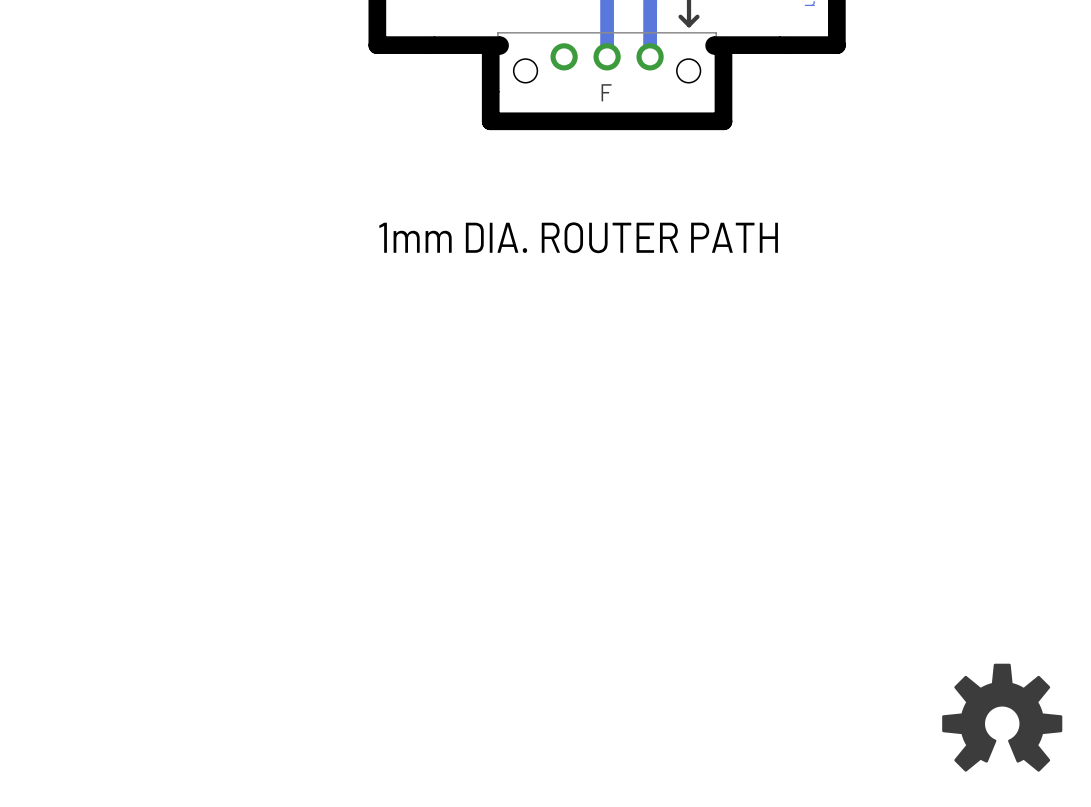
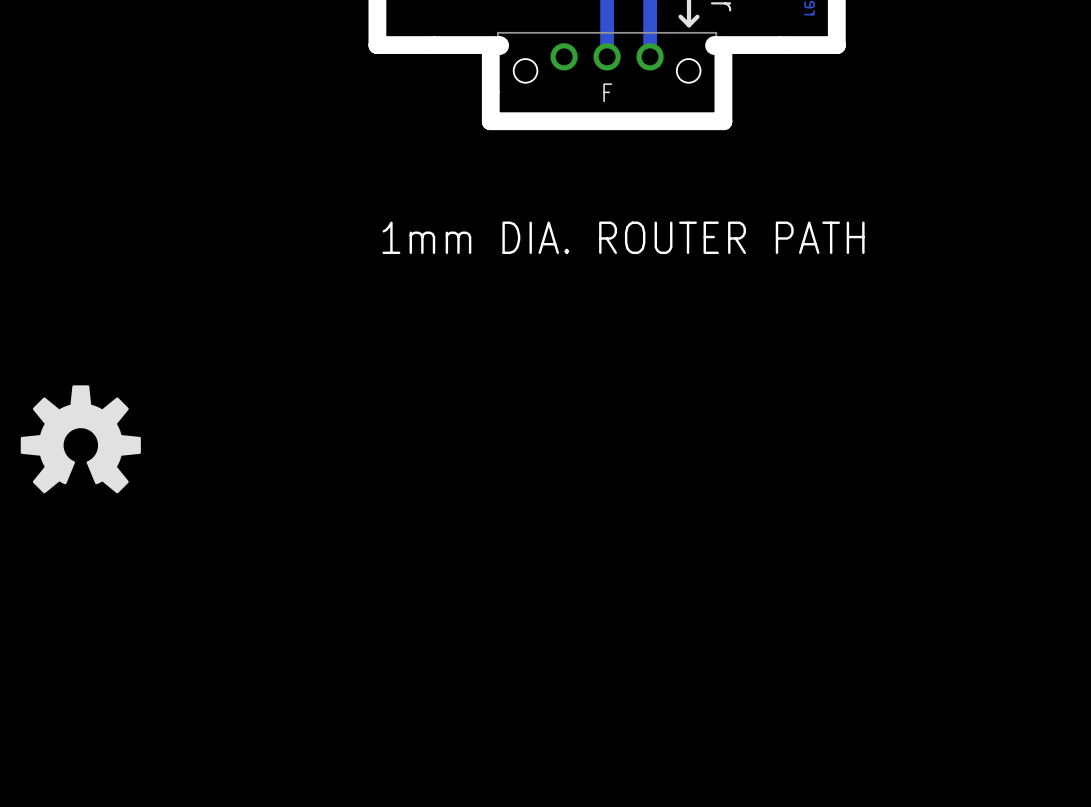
drawing: none -> [20, 385, 141, 494]
drawing: [942, 663, 1063, 772] -> none

